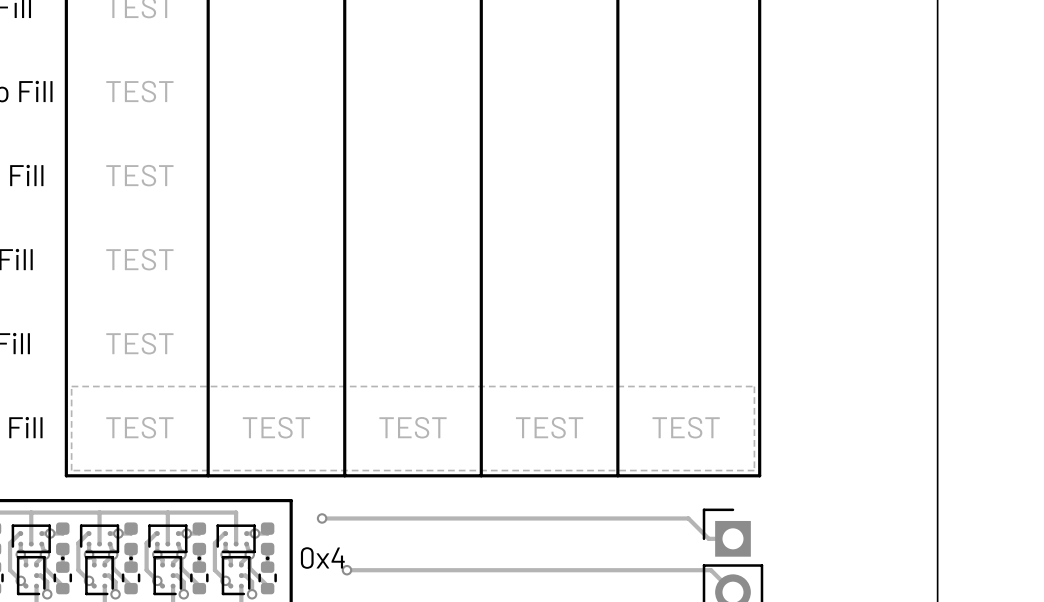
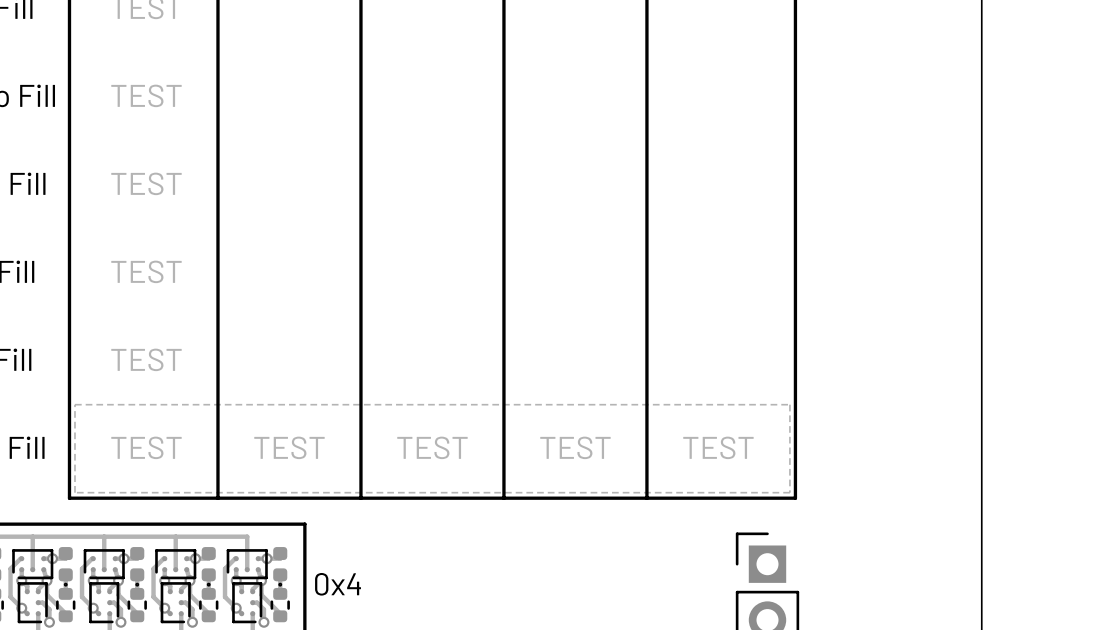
track: (322, 518) (688, 518) (708, 538) (732, 538) -> none
via: (322, 518) -> none
track: (346, 570) (711, 570) (732, 592) -> none
via: (346, 570) -> none

